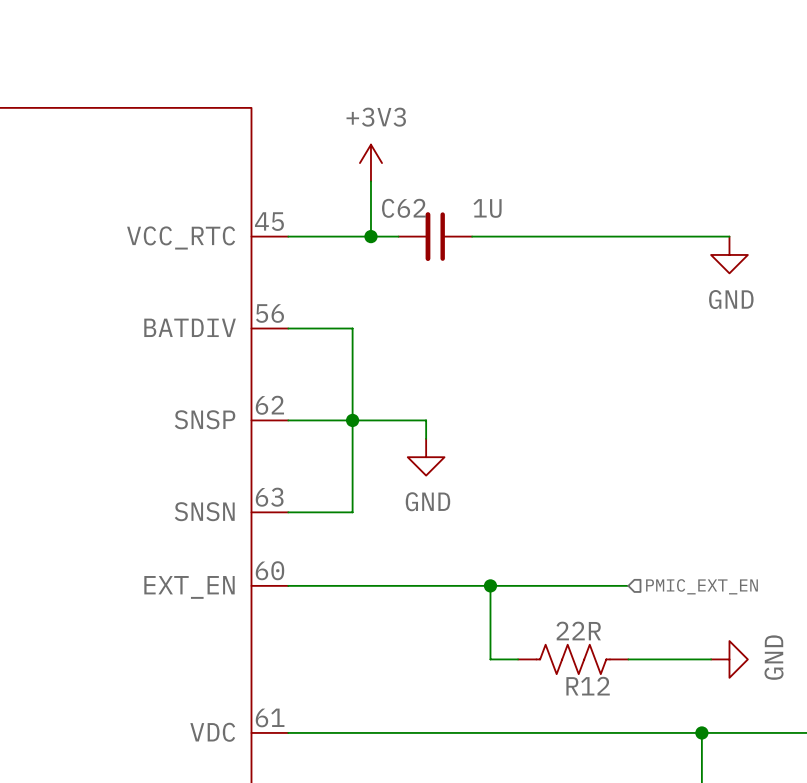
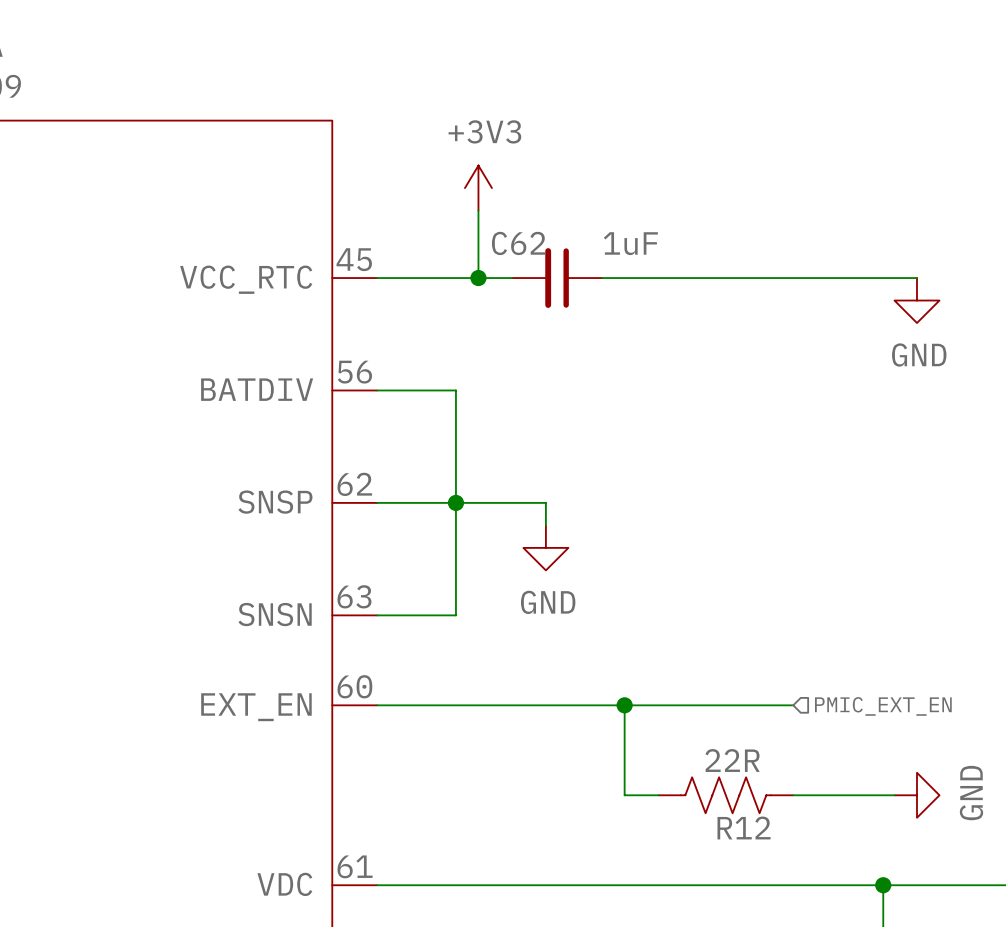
C62 value: 1U (487, 208) -> 1uF (630, 243)

